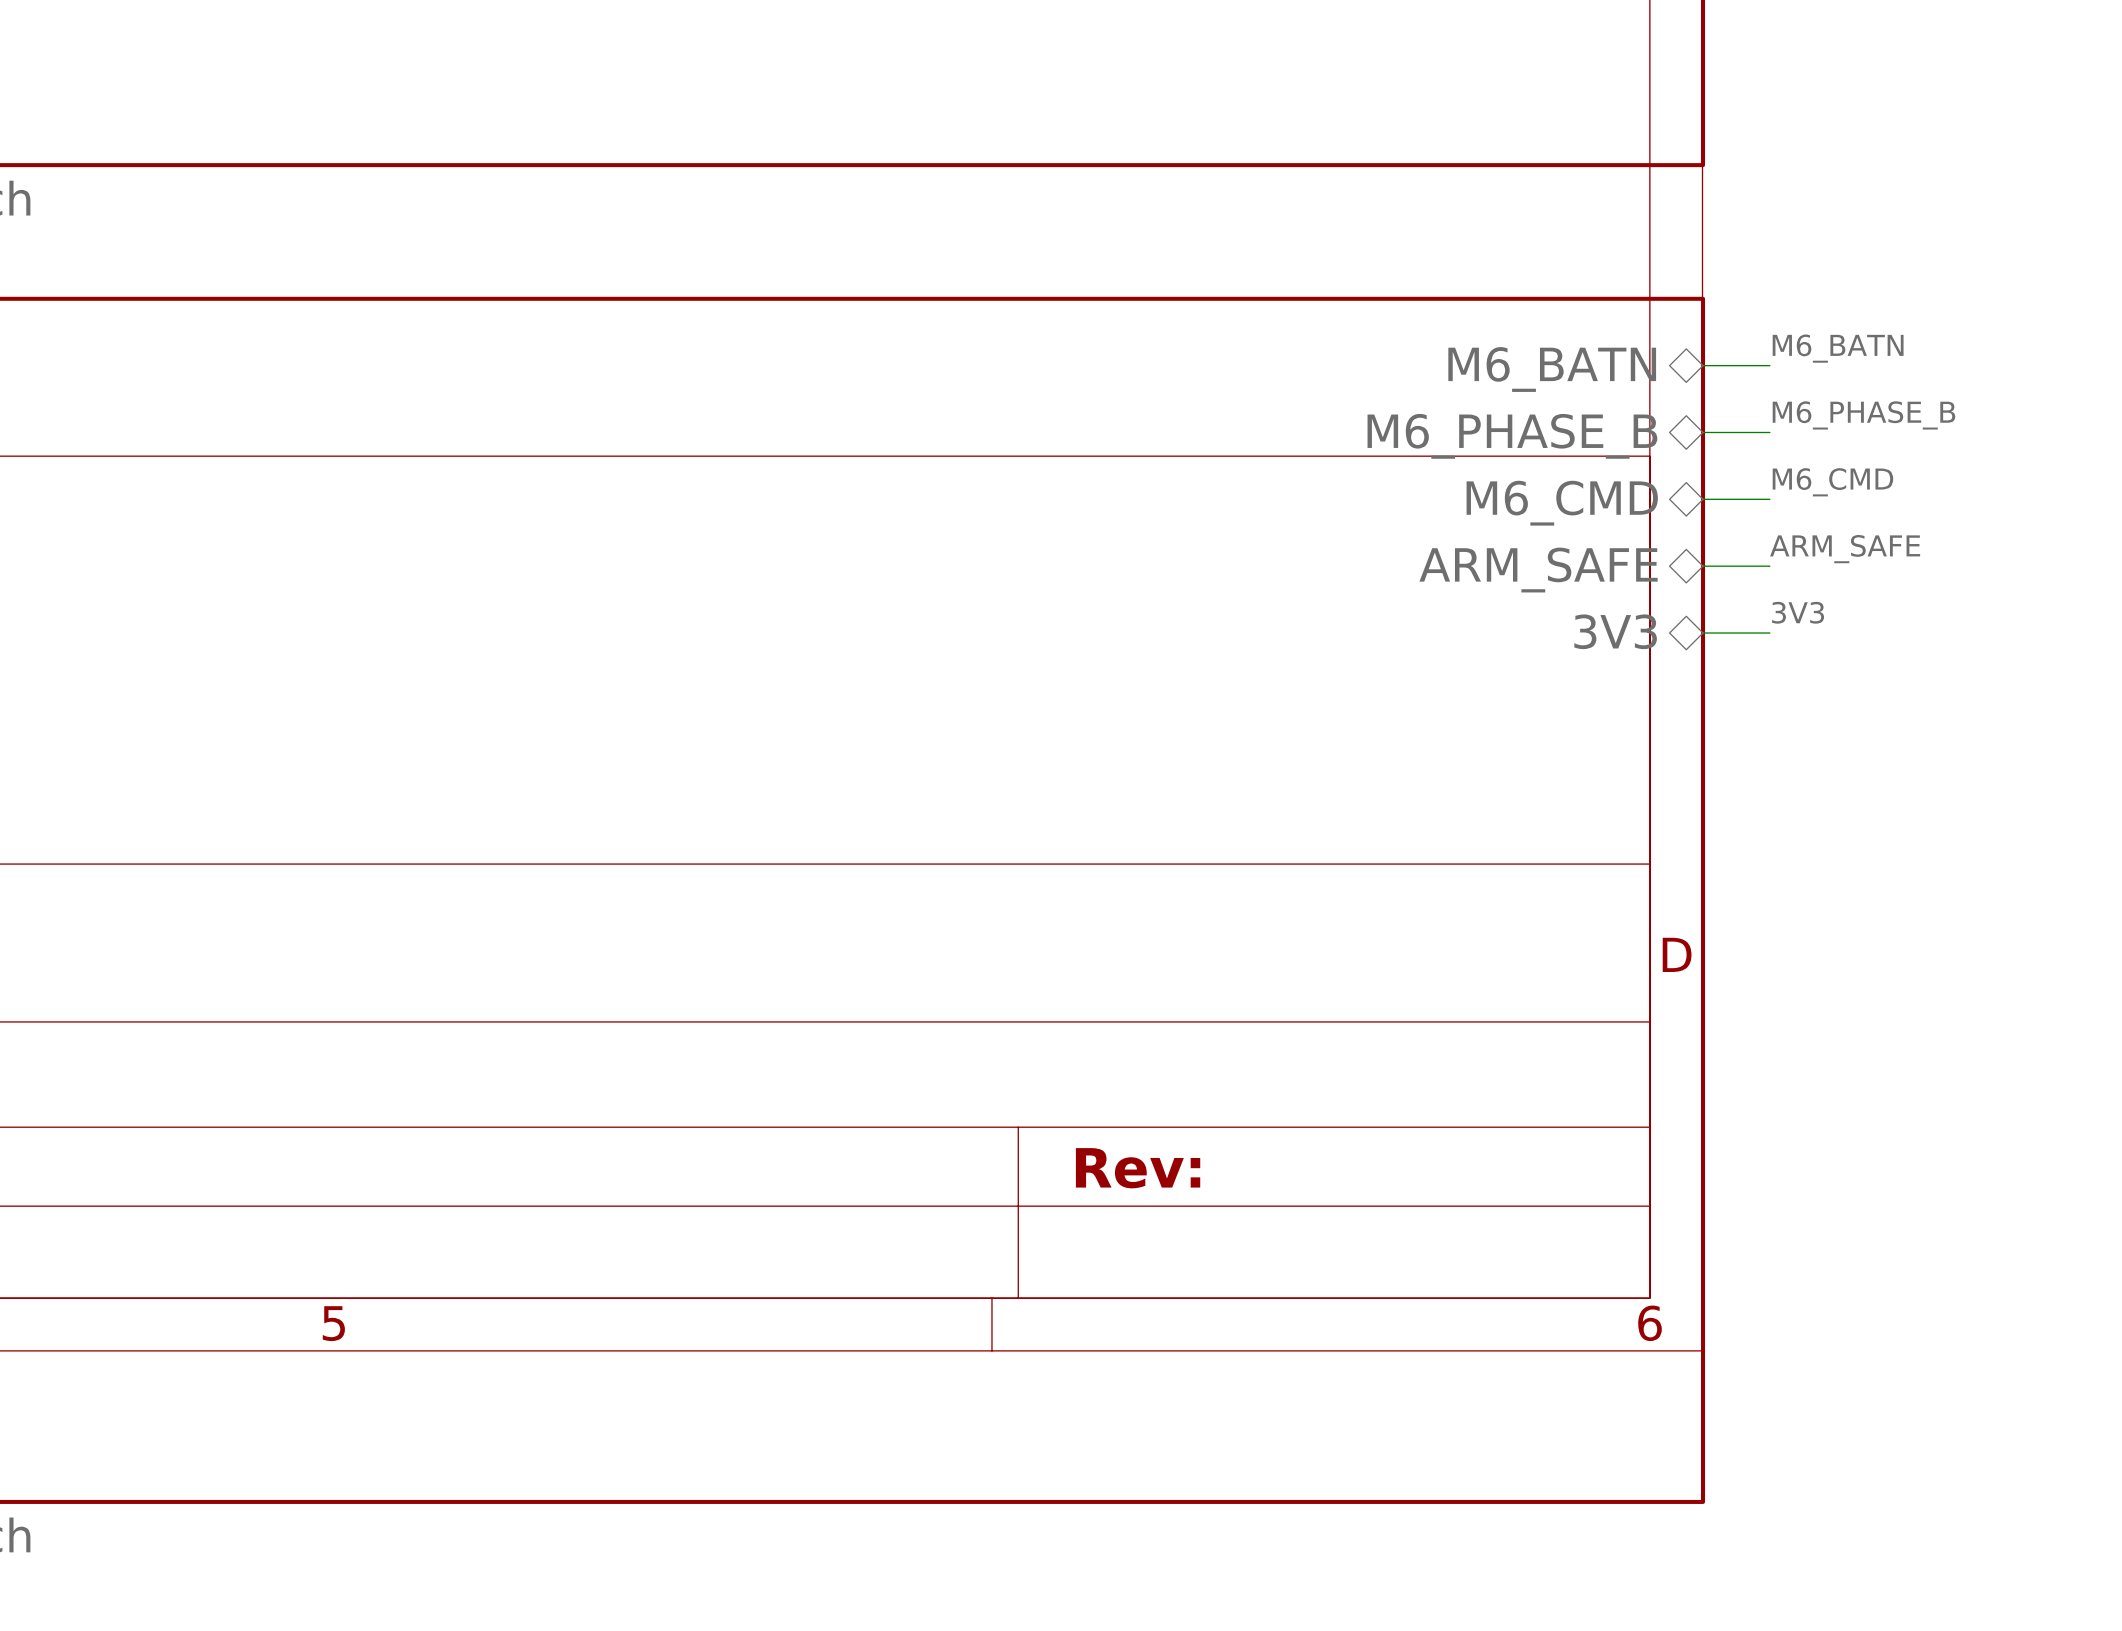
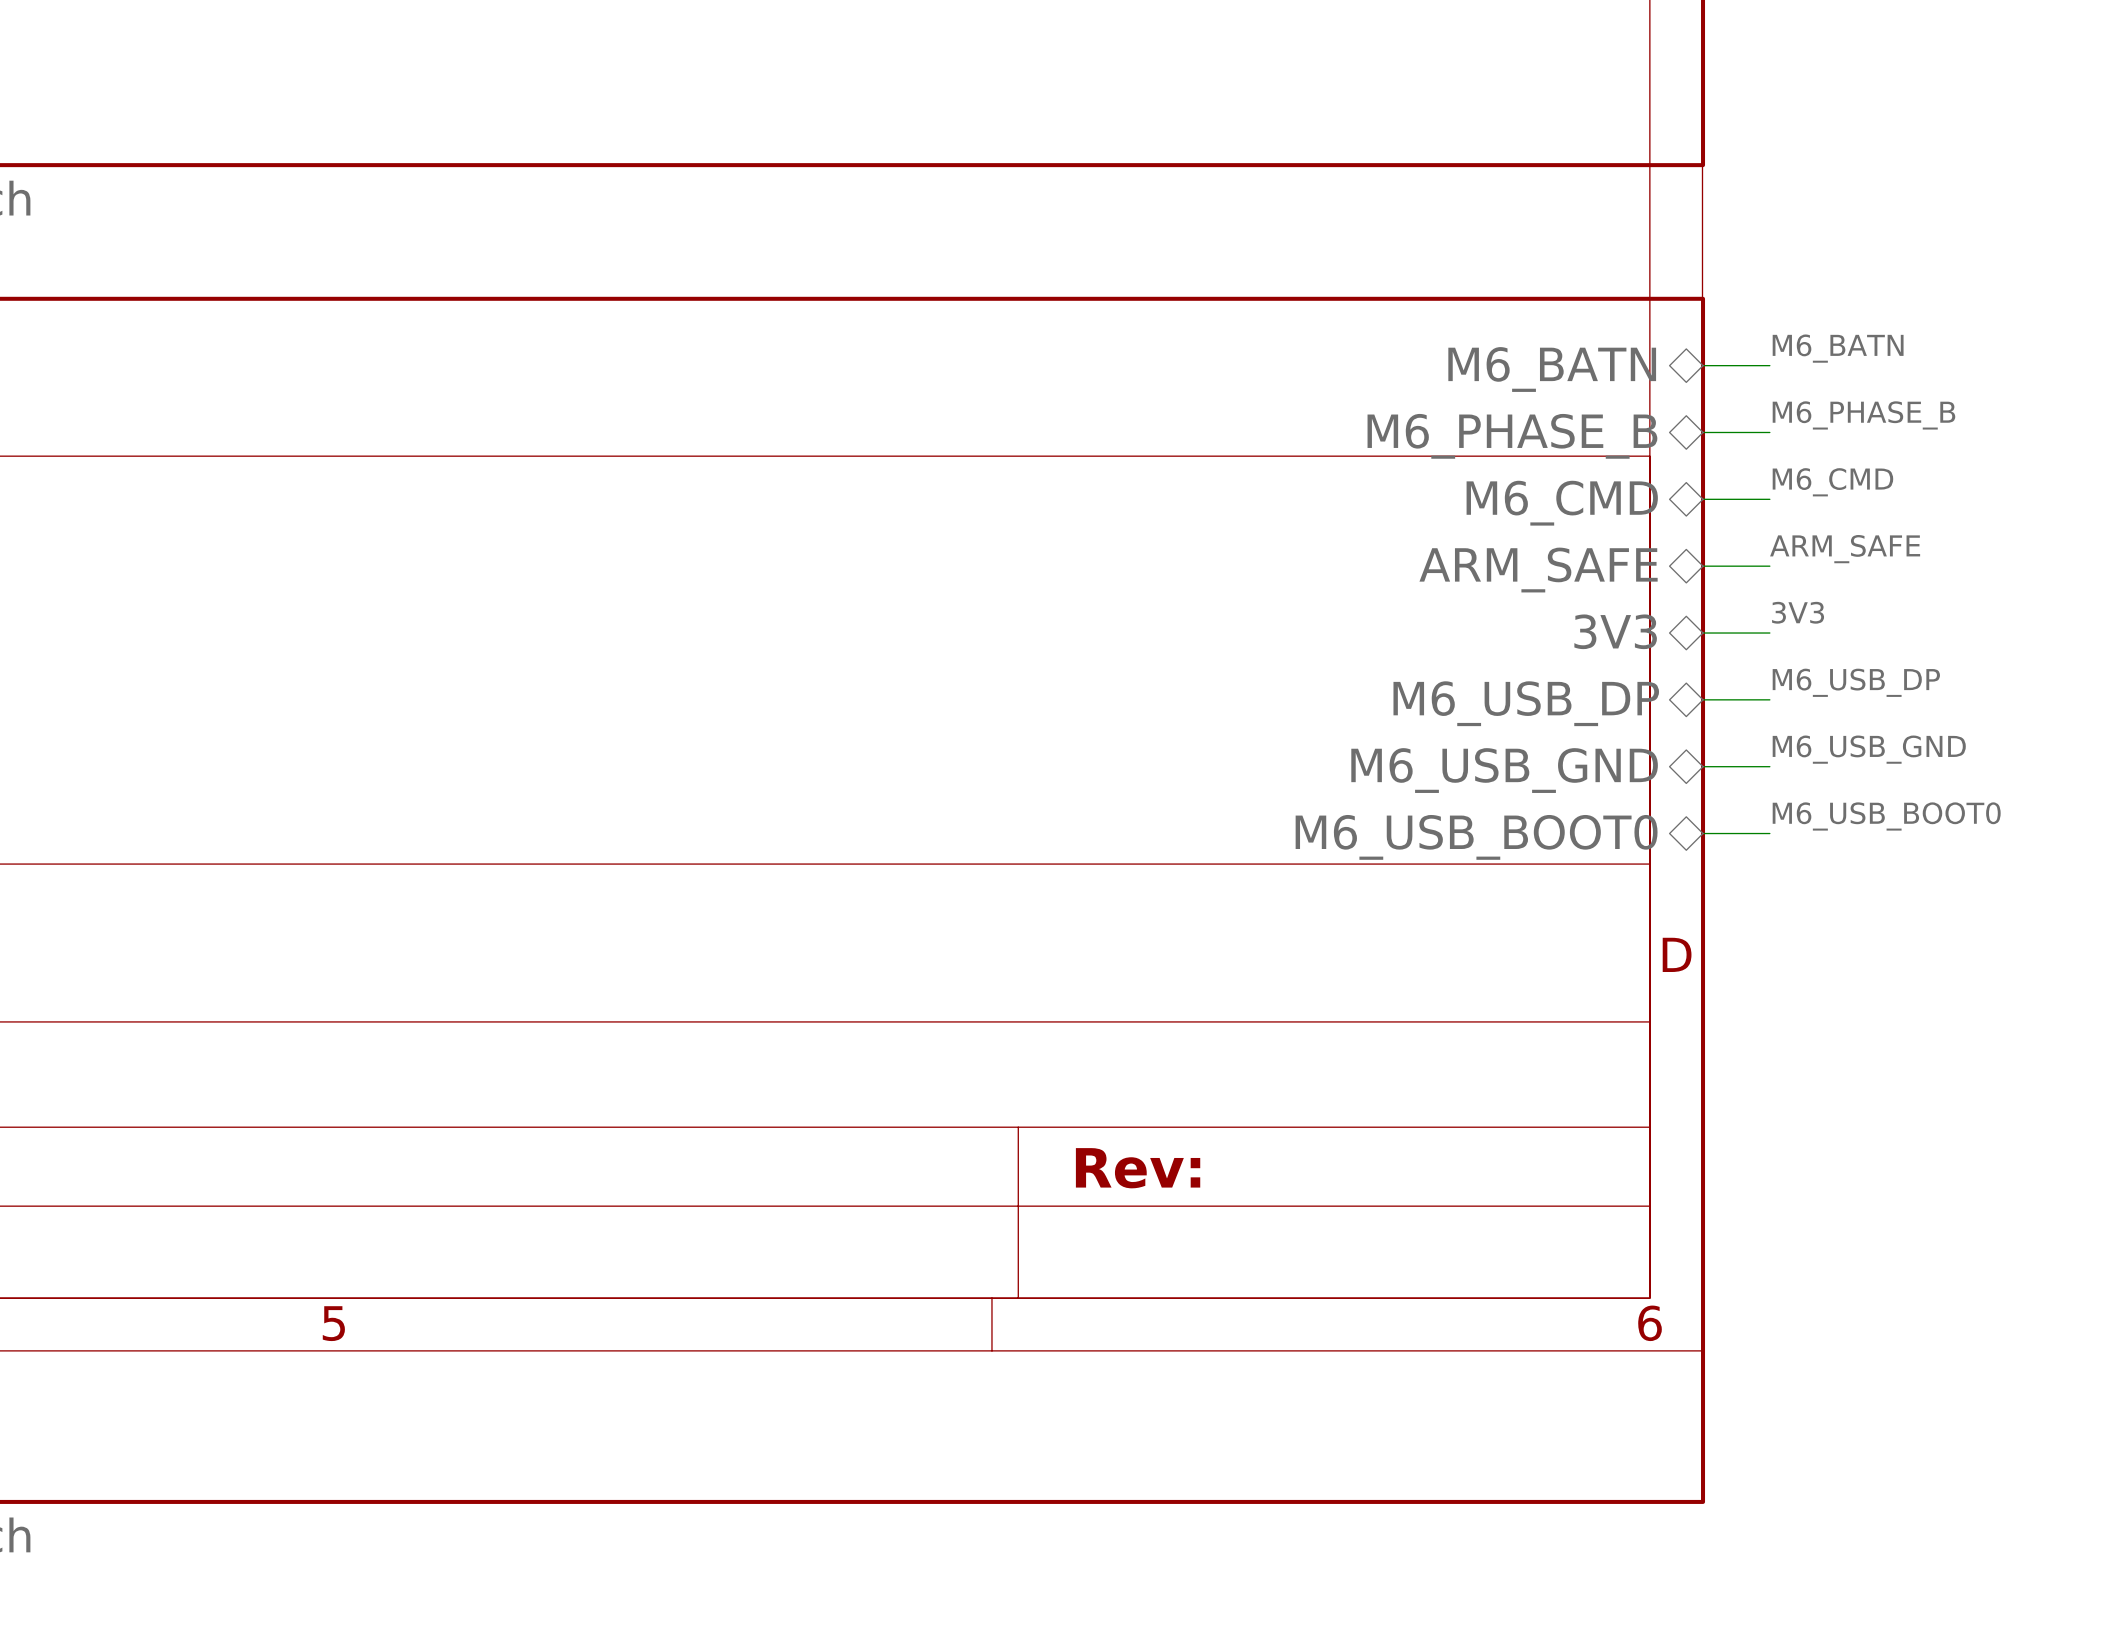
label: none -> M6_USB_DP (1856, 682)
wire: none -> (1703, 699) (1769, 699)
sheet pin: none -> M6_USB_DP (1526, 703)
label: none -> M6_USB_GND (1869, 749)
wire: none -> (1703, 766) (1769, 766)
sheet pin: none -> M6_USB_GND (1504, 770)
label: none -> M6_USB_BOOT0 (1886, 816)
wire: none -> (1703, 833) (1769, 833)
sheet pin: none -> M6_USB_BOOT0 (1476, 837)

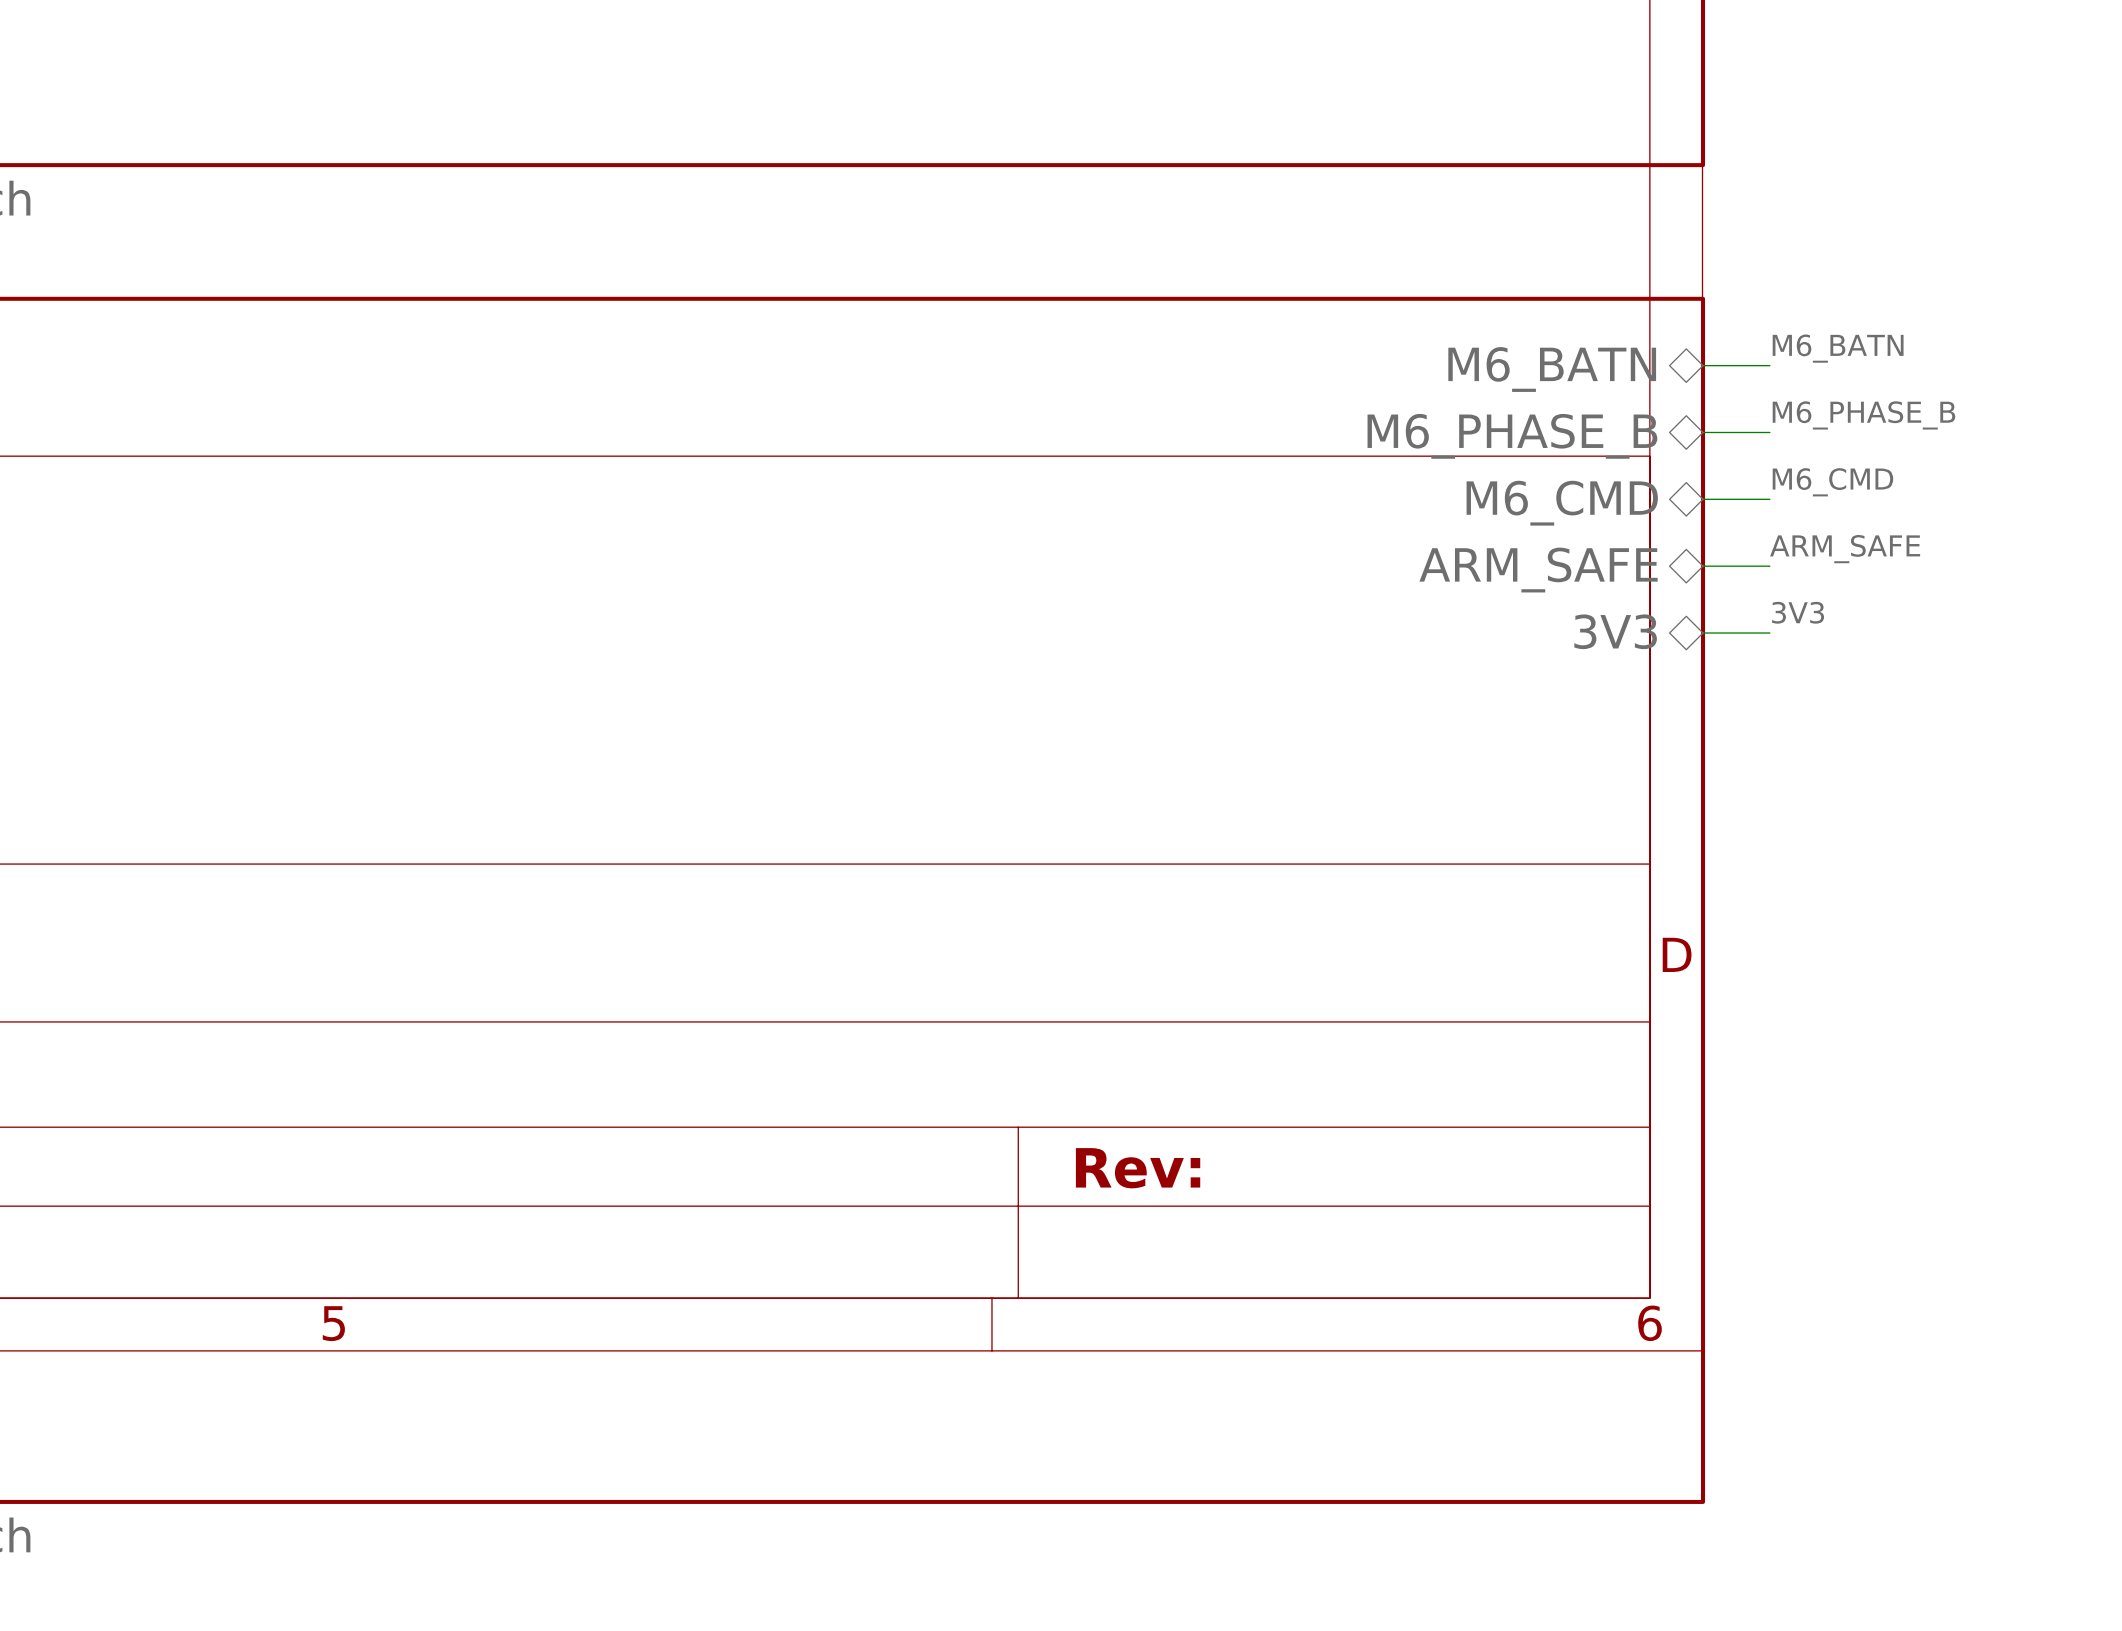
label: M6_USB_DP (1856, 682) -> none
wire: (1703, 699) (1769, 699) -> none
sheet pin: M6_USB_DP (1526, 703) -> none
label: M6_USB_GND (1869, 749) -> none
wire: (1703, 766) (1769, 766) -> none
sheet pin: M6_USB_GND (1504, 770) -> none
label: M6_USB_BOOT0 (1886, 816) -> none
wire: (1703, 833) (1769, 833) -> none
sheet pin: M6_USB_BOOT0 (1476, 837) -> none

